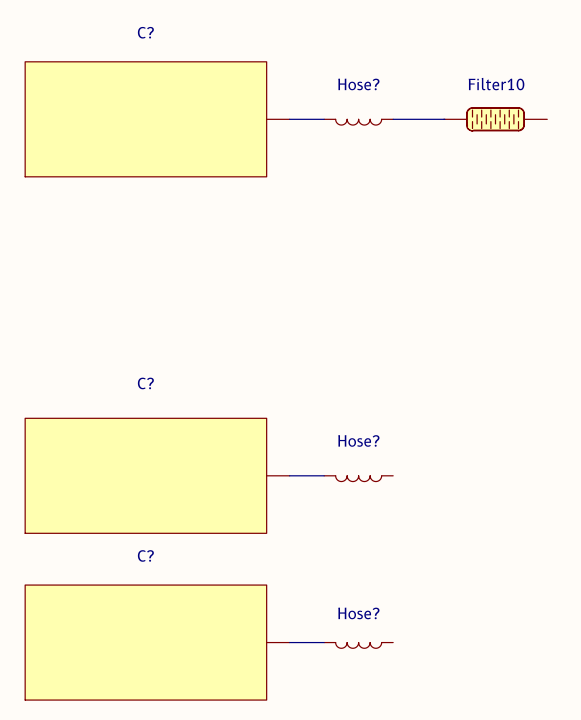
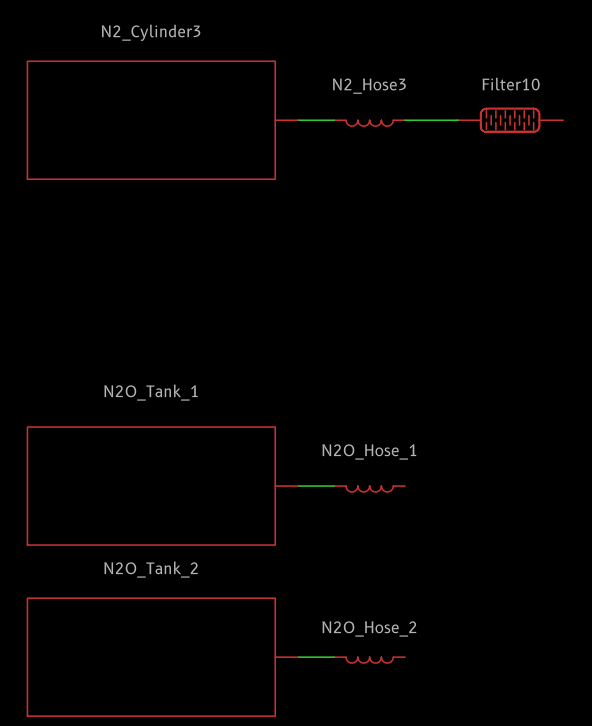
C? name: C? (145, 32) -> N2_Cylinder3 (151, 32)
Hose? name: Hose? (358, 84) -> N2_Hose3 (369, 86)
C? name: C? (145, 383) -> N2O_Tank_1 (151, 392)
Hose? name: Hose? (358, 440) -> N2O_Hose_1 (369, 451)
C? name: C? (145, 555) -> N2O_Tank_2 (151, 569)
Hose? name: Hose? (358, 613) -> N2O_Hose_2 (369, 628)

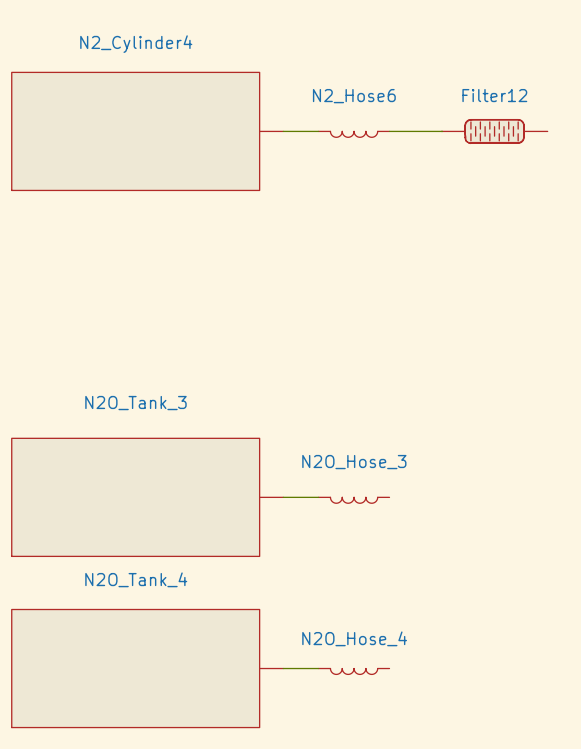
N2_Cylinder3 name: N2_Cylinder3 (151, 32) -> N2_Cylinder4 (136, 44)
Filter10 name: Filter10 (511, 84) -> Filter12 (494, 95)
N2_Hose3 name: N2_Hose3 (369, 86) -> N2_Hose6 (354, 96)
N2O_Tank_1 name: N2O_Tank_1 (151, 392) -> N2O_Tank_3 (135, 403)
N2O_Hose_1 name: N2O_Hose_1 (369, 451) -> N2O_Hose_3 (354, 462)
N2O_Tank_2 name: N2O_Tank_2 (151, 569) -> N2O_Tank_4 (136, 579)
N2O_Hose_2 name: N2O_Hose_2 (369, 628) -> N2O_Hose_4 (354, 638)

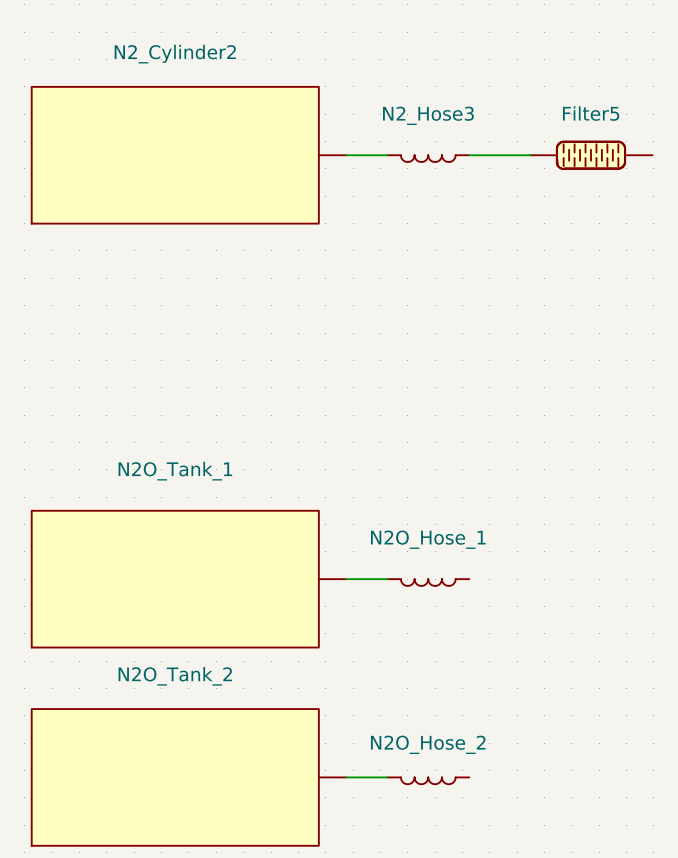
N2_Cylinder4 name: N2_Cylinder4 (136, 44) -> N2_Cylinder2 (175, 54)
Filter12 name: Filter12 (494, 95) -> Filter5 (591, 113)
N2_Hose6 name: N2_Hose6 (354, 96) -> N2_Hose3 (428, 115)
N2O_Tank_3 name: N2O_Tank_3 (135, 403) -> N2O_Tank_1 (175, 471)
N2O_Hose_3 name: N2O_Hose_3 (354, 462) -> N2O_Hose_1 (428, 539)
N2O_Tank_4 name: N2O_Tank_4 (136, 579) -> N2O_Tank_2 (175, 676)
N2O_Hose_4 name: N2O_Hose_4 (354, 638) -> N2O_Hose_2 (428, 744)

